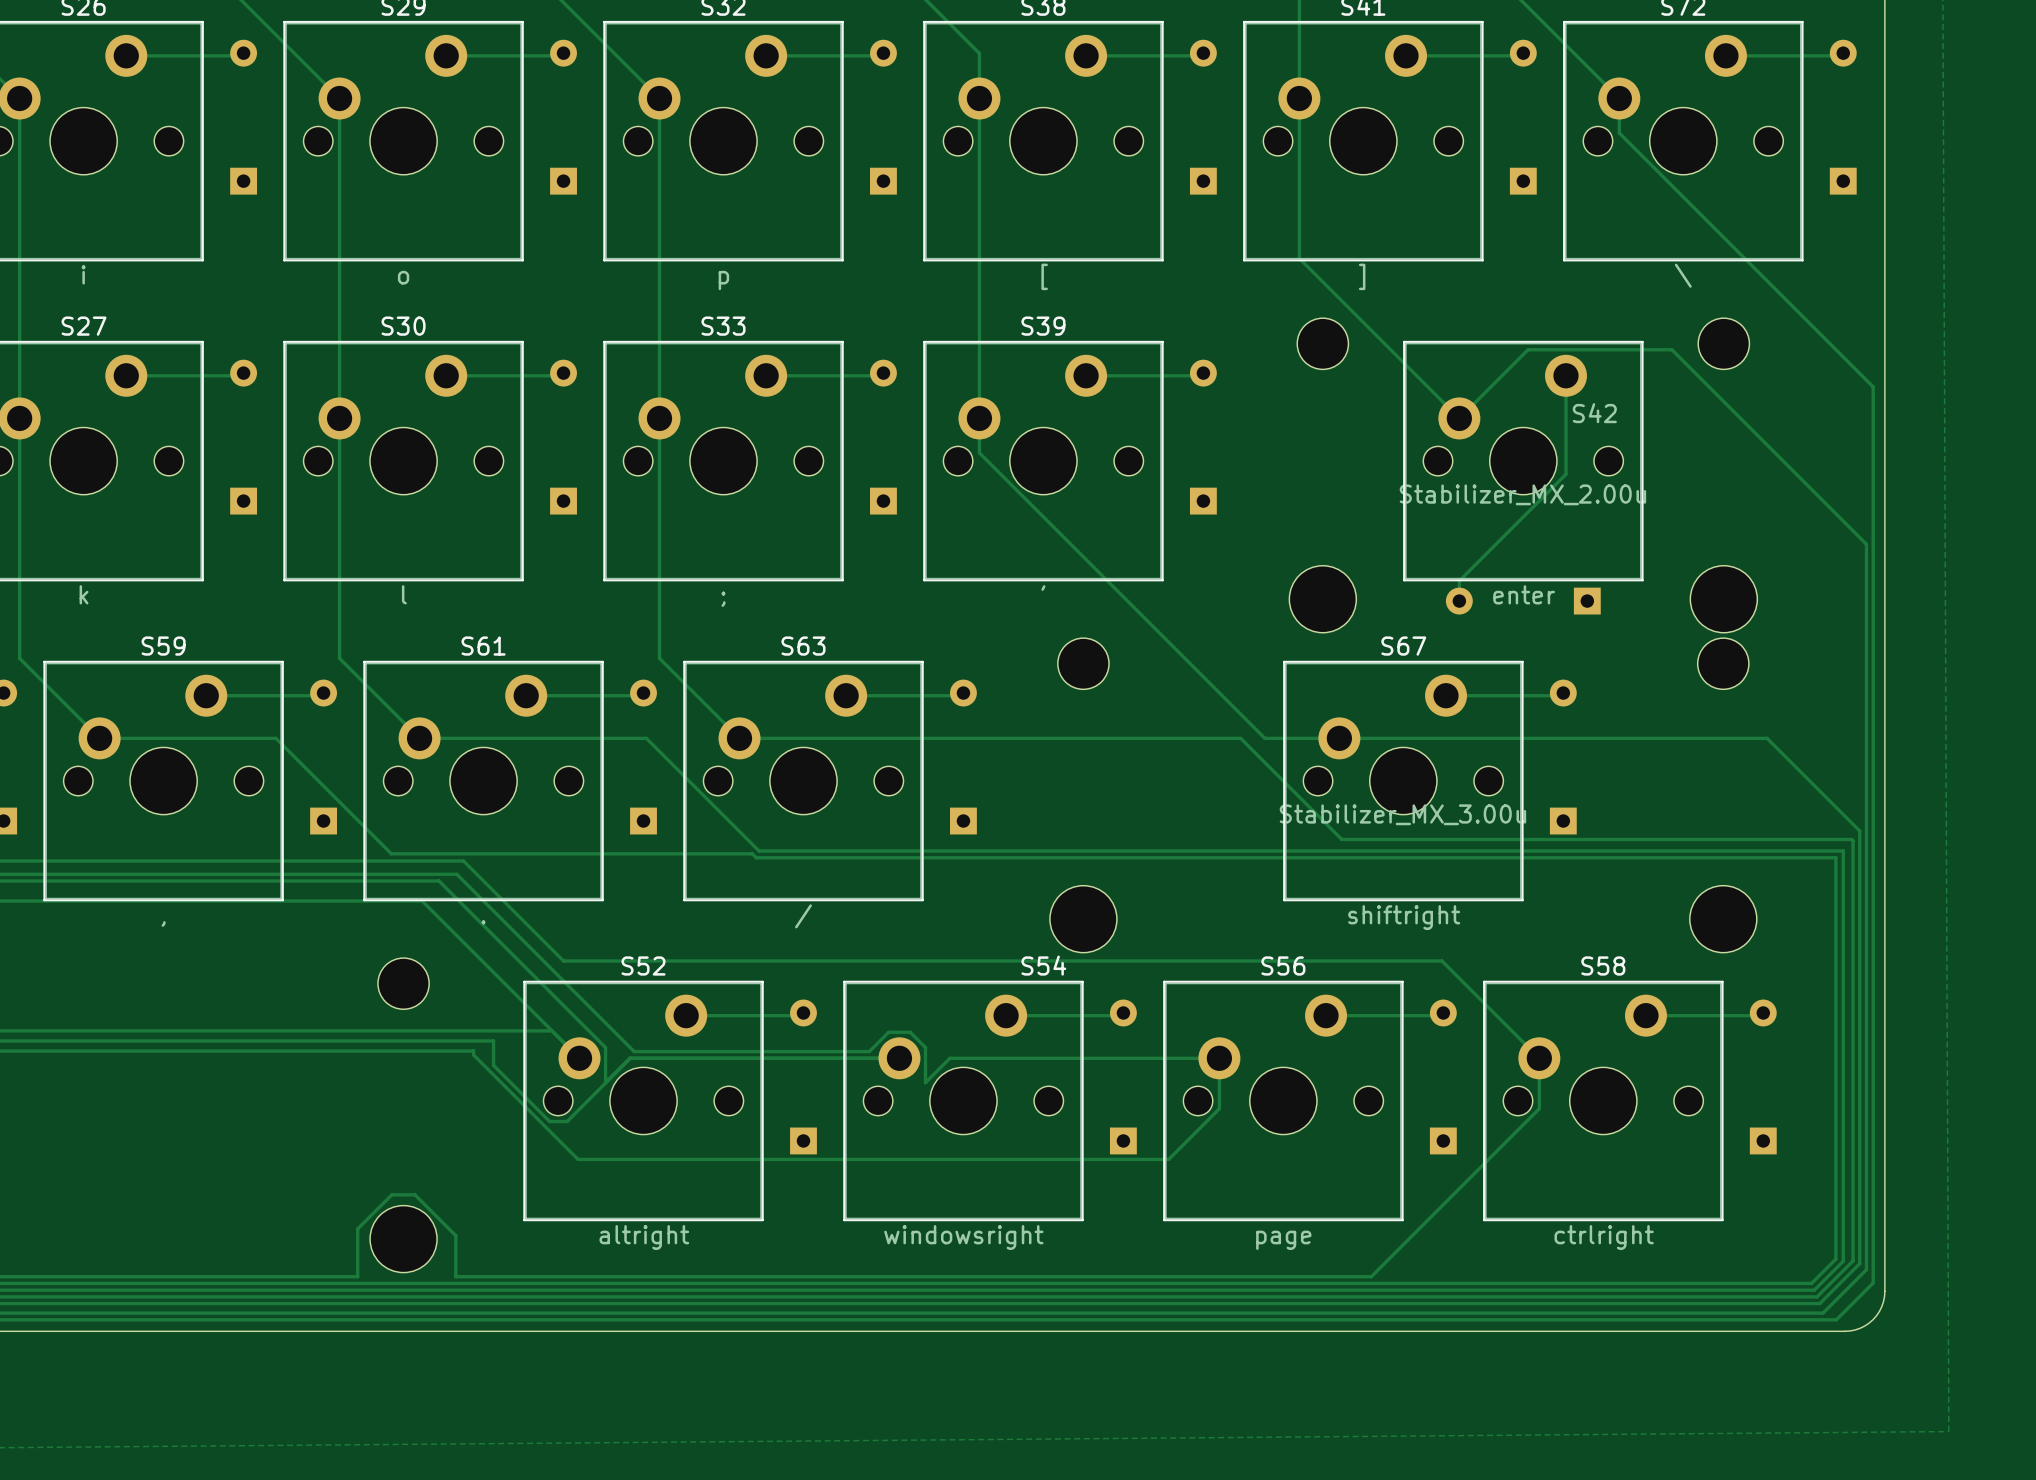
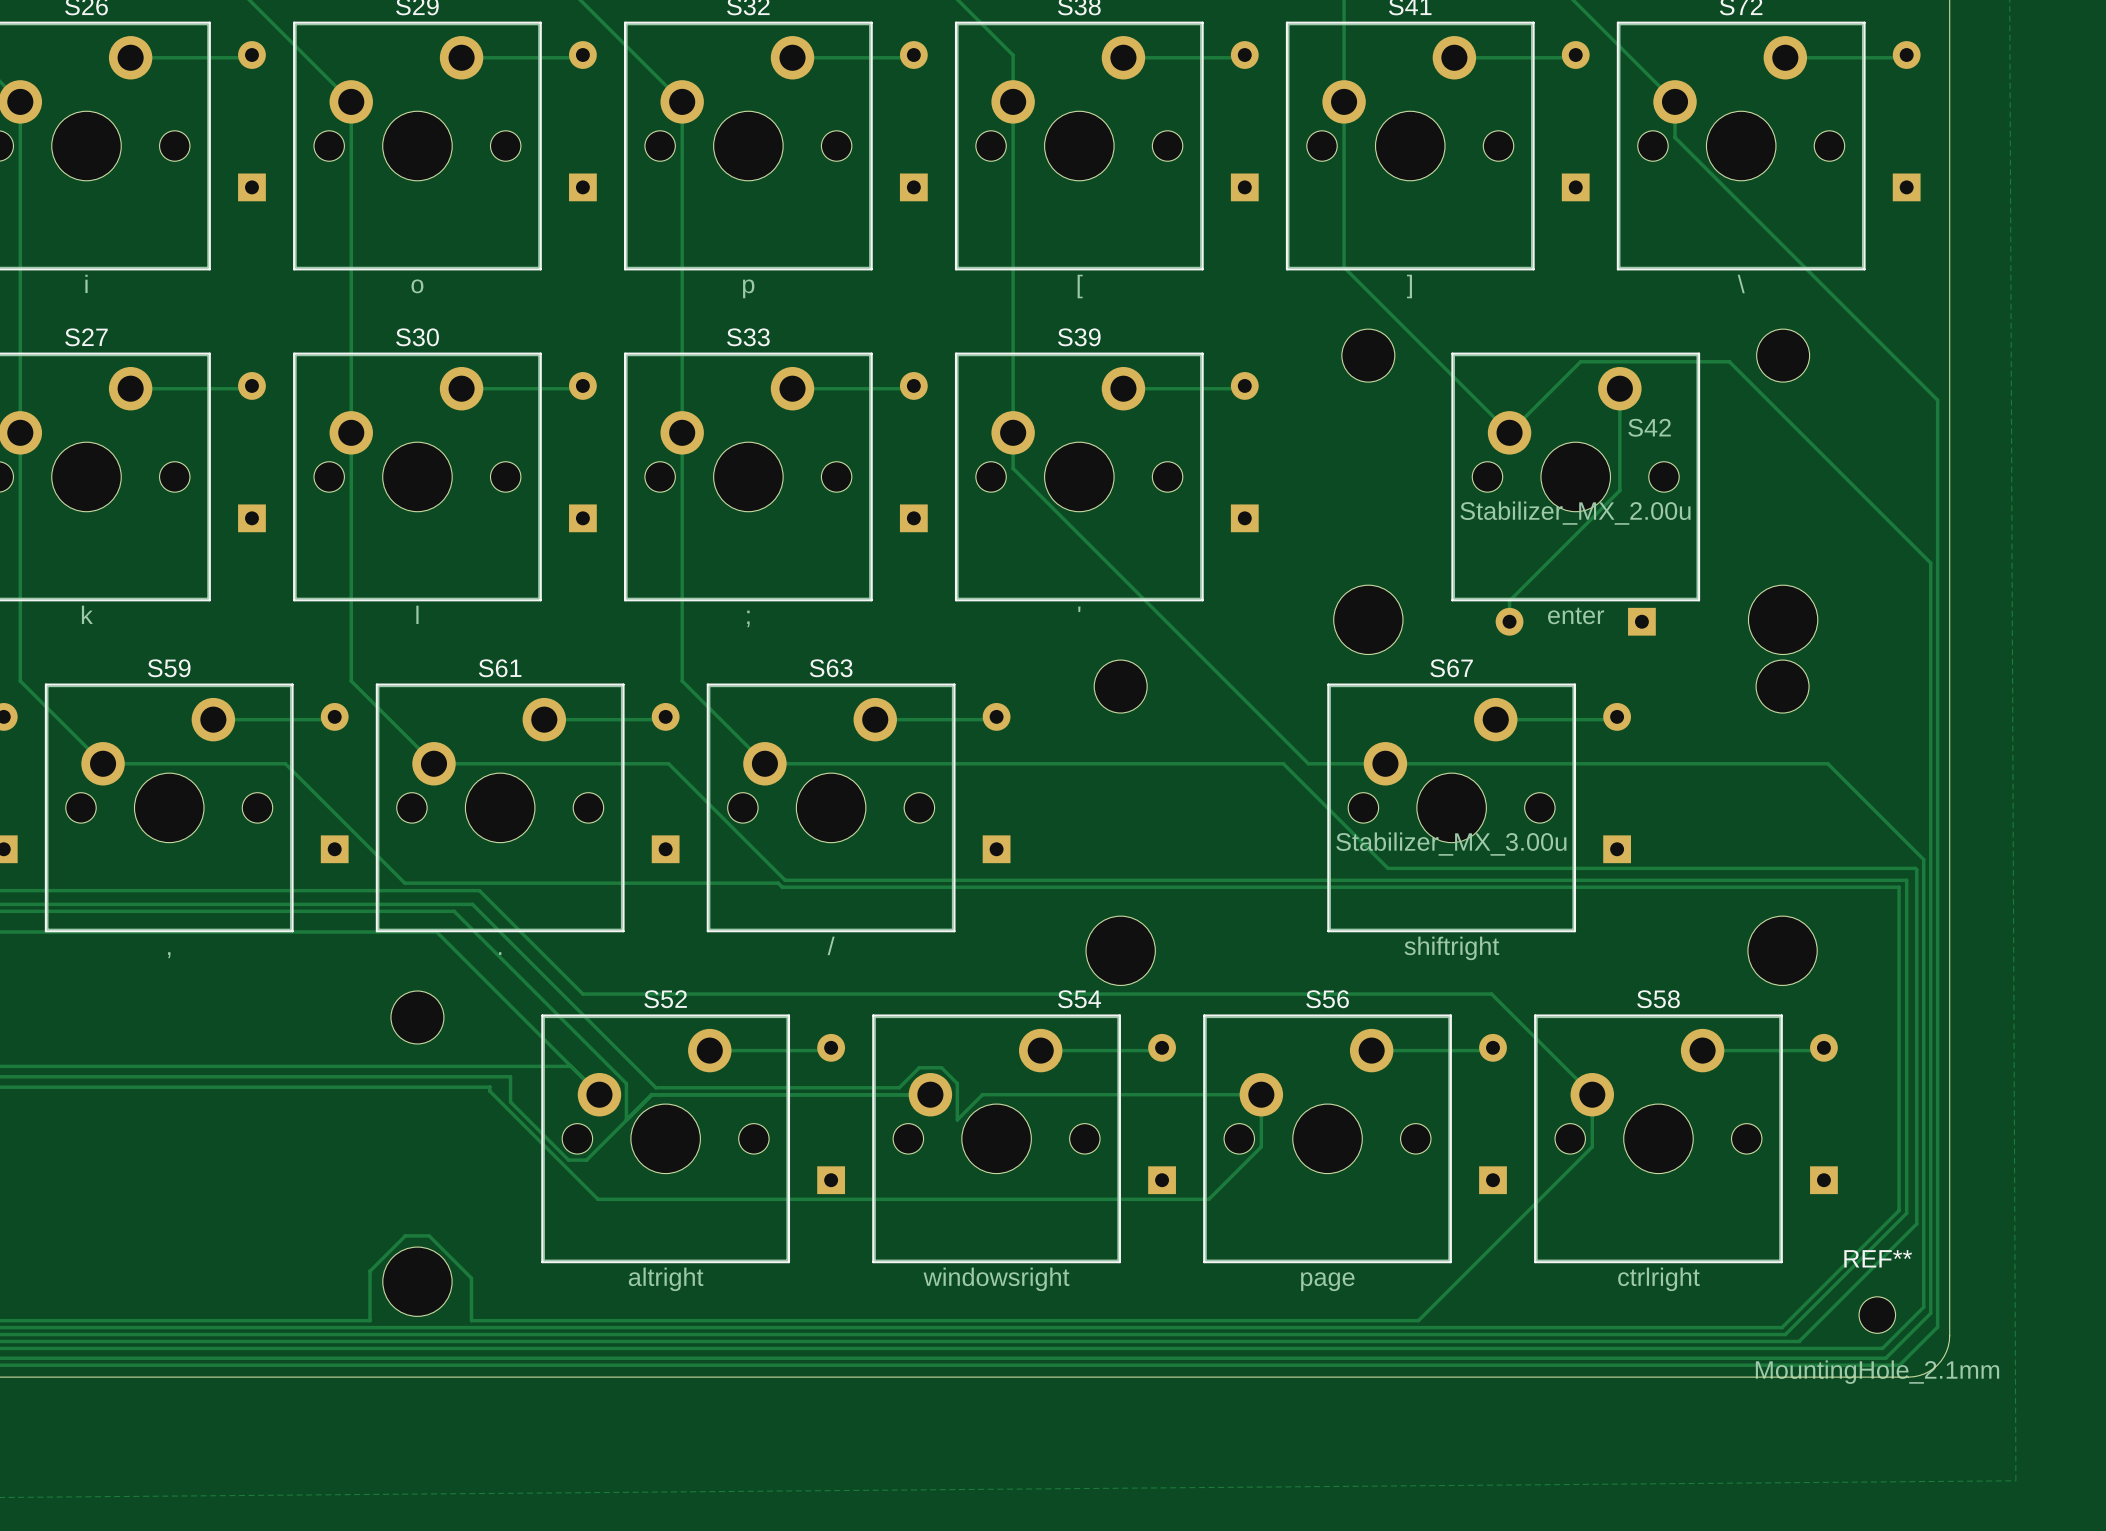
track: (1835, 1170) (1835, 1259) (1811, 1283) (1722, 1283) -> (1899, 1210) (1782, 1327)
track: (1843, 1172) (1843, 1261) (1814, 1290) (1726, 1290) -> (1906, 1213) (1785, 1334)
track: (1853, 1183) (1853, 1260) (1817, 1296) (1739, 1296) -> (1916, 1223) (1799, 1341)
REF**: none -> MountingHole_2.1mm (1877, 1315)

